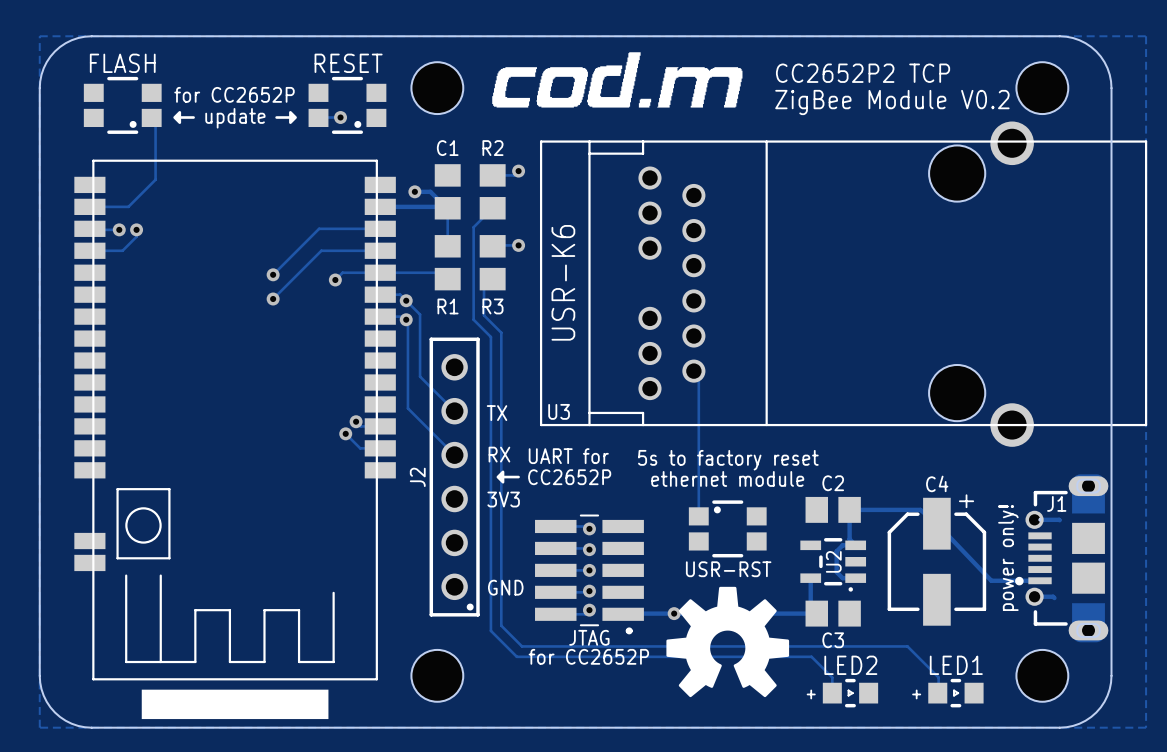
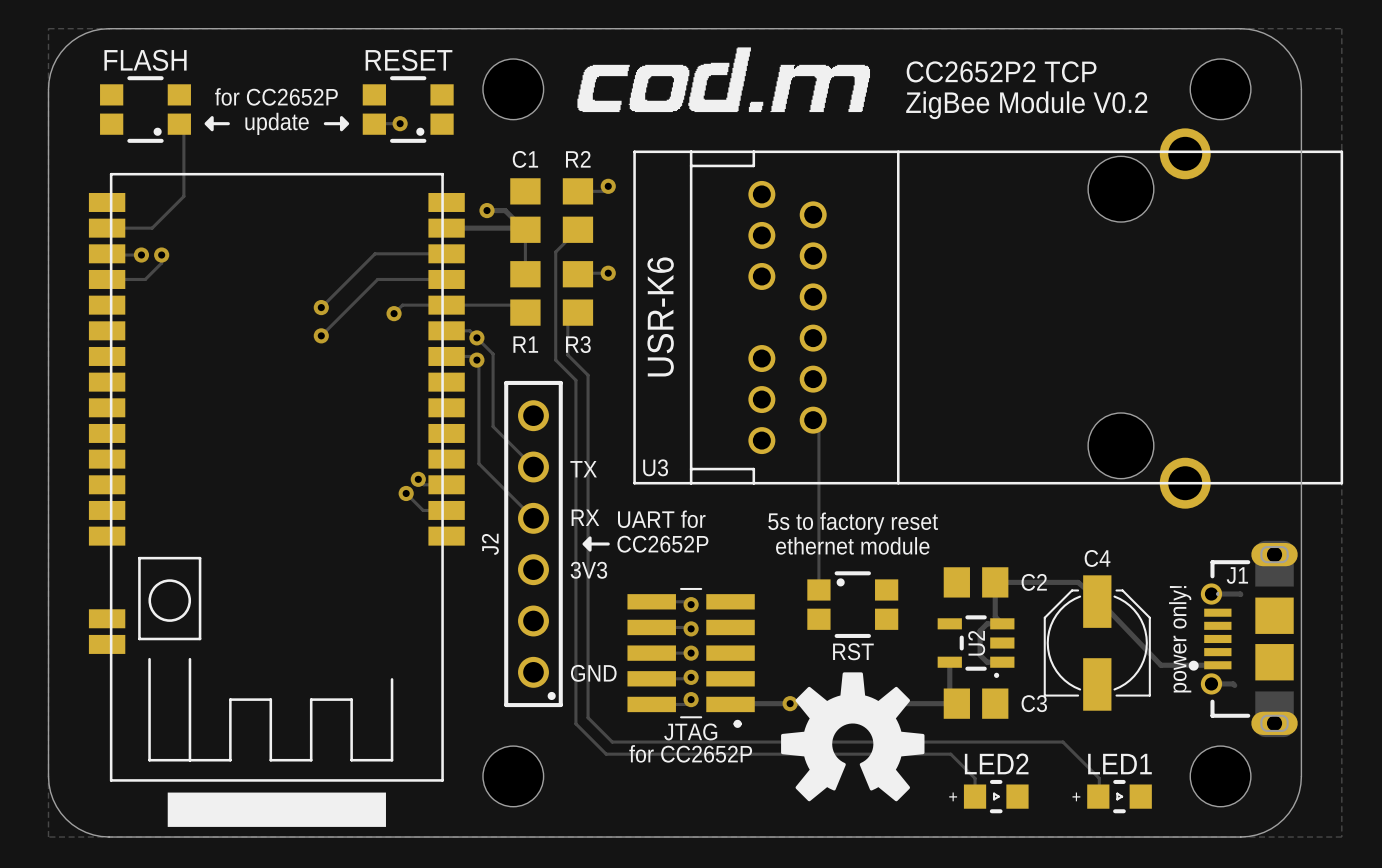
C2 name position: C2 (833, 483) -> C2 (1034, 582)
C4 footprint: [887, 497, 987, 626] -> [1043, 575, 1151, 711]
USR-RST name: USR-RST (728, 569) -> RST (853, 651)
C3 name position: C3 (833, 640) -> C3 (1034, 703)

